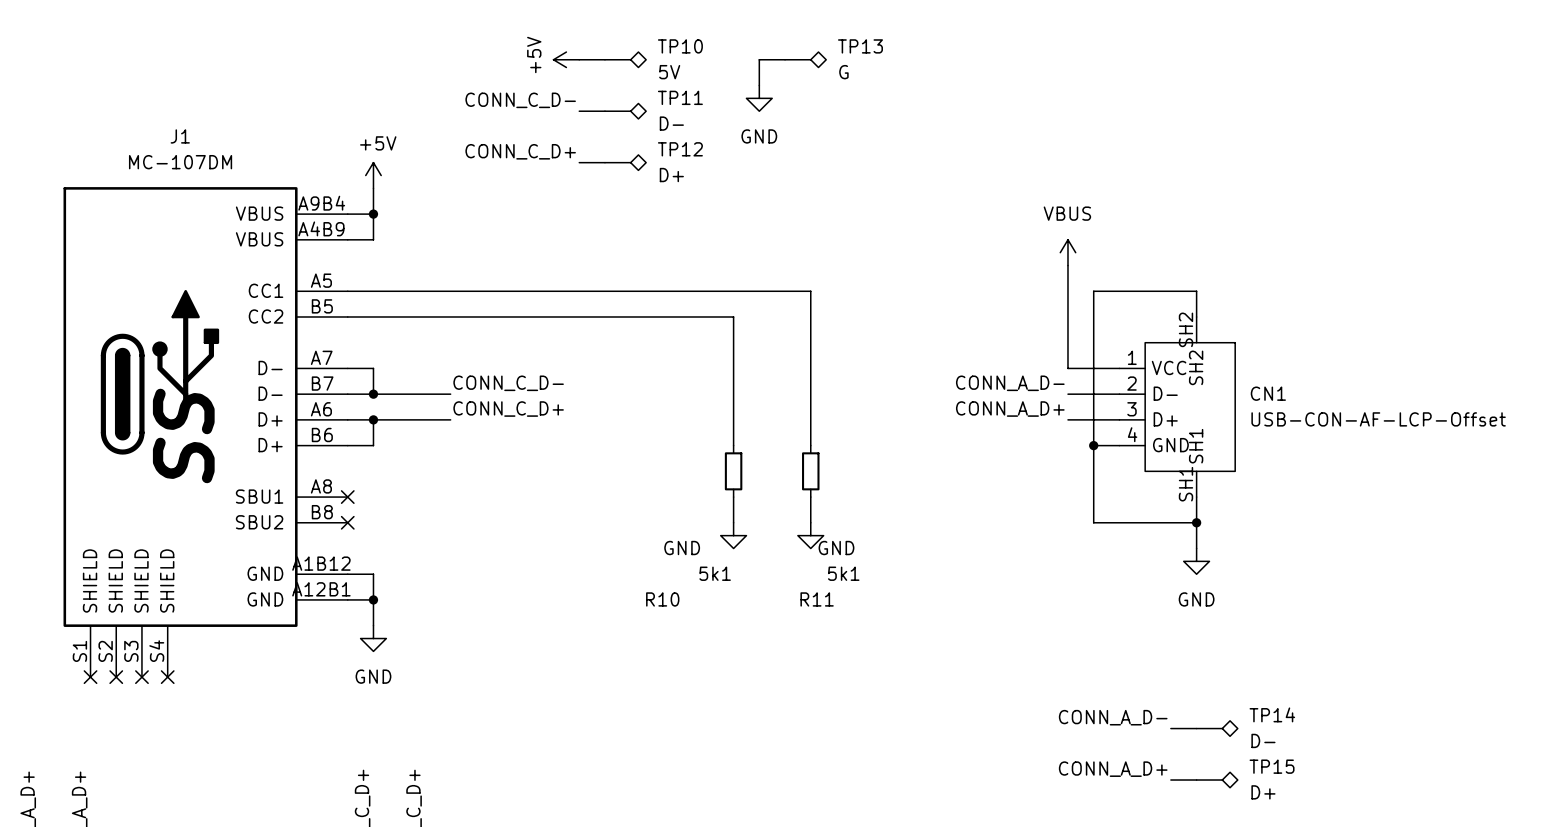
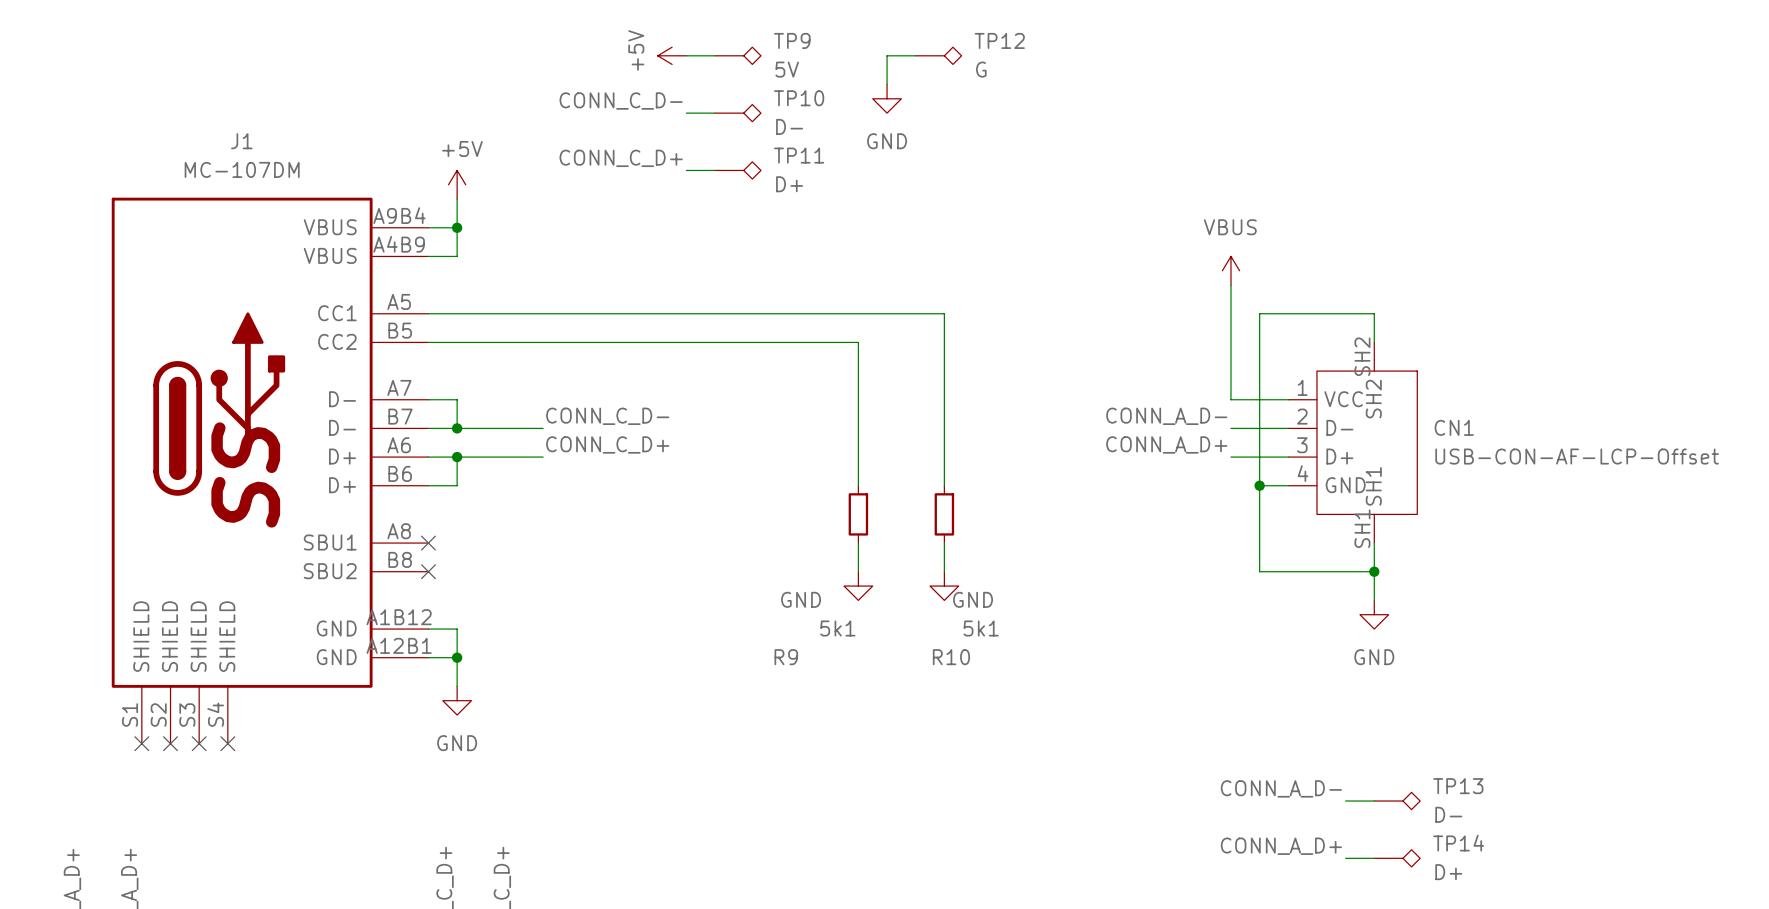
TP10 name: TP10 (680, 46) -> TP9 (792, 40)
TP13 name: TP13 (860, 46) -> TP12 (999, 40)
TP11 name: TP11 (680, 97) -> TP10 (799, 98)
TP12 name: TP12 (680, 149) -> TP11 (799, 155)
R10 name: R10 (662, 599) -> R9 (786, 657)
R11 name: R11 (817, 599) -> R10 (951, 657)
TP14 name: TP14 (1272, 714) -> TP13 (1458, 786)
TP15 name: TP15 (1272, 766) -> TP14 (1458, 843)

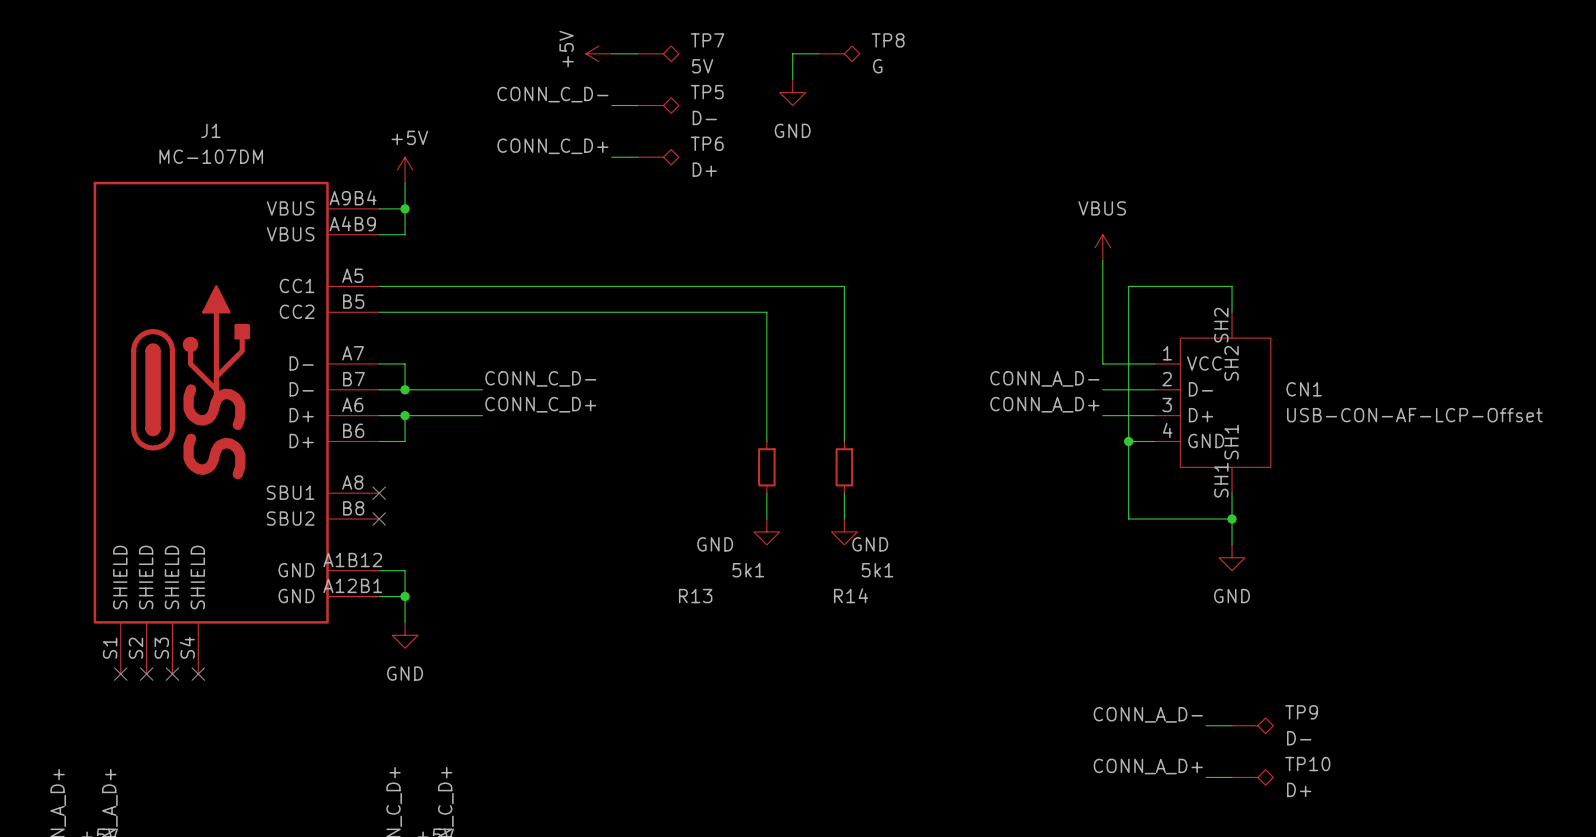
TP9 name: TP9 (792, 40) -> TP7 (707, 40)
TP12 name: TP12 (999, 40) -> TP8 (888, 40)
TP10 name: TP10 (799, 98) -> TP5 (707, 92)
TP11 name: TP11 (799, 155) -> TP6 (707, 143)
R9 name: R9 (786, 657) -> R13 (695, 596)
R10 name: R10 (951, 657) -> R14 (851, 595)
TP13 name: TP13 (1458, 786) -> TP9 (1301, 712)
TP14 name: TP14 (1458, 843) -> TP10 (1307, 764)

